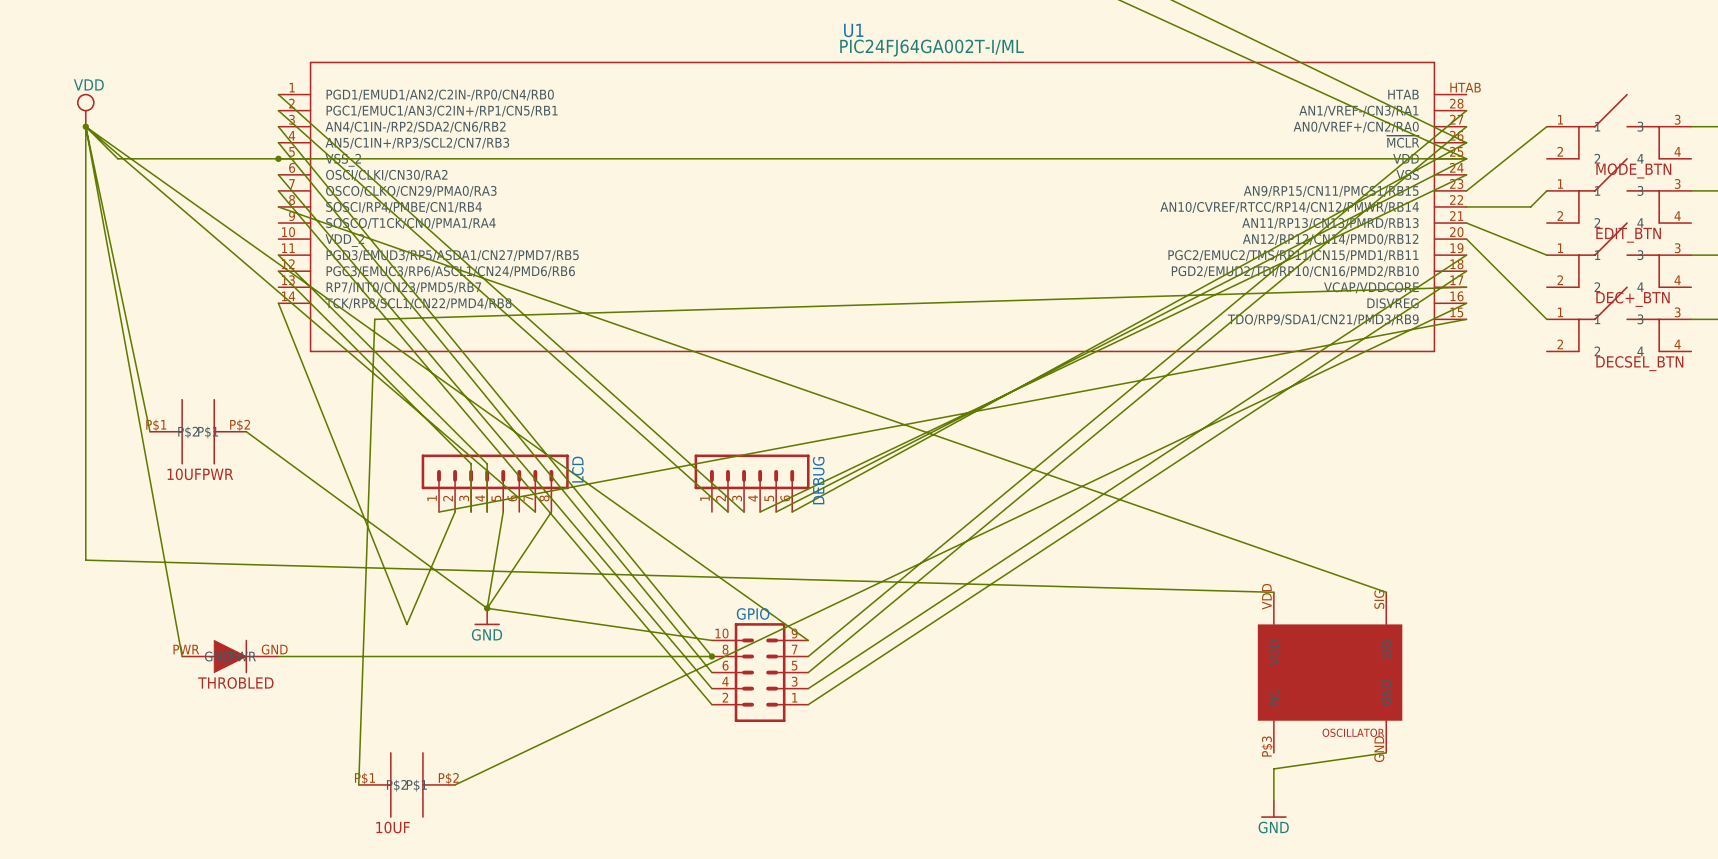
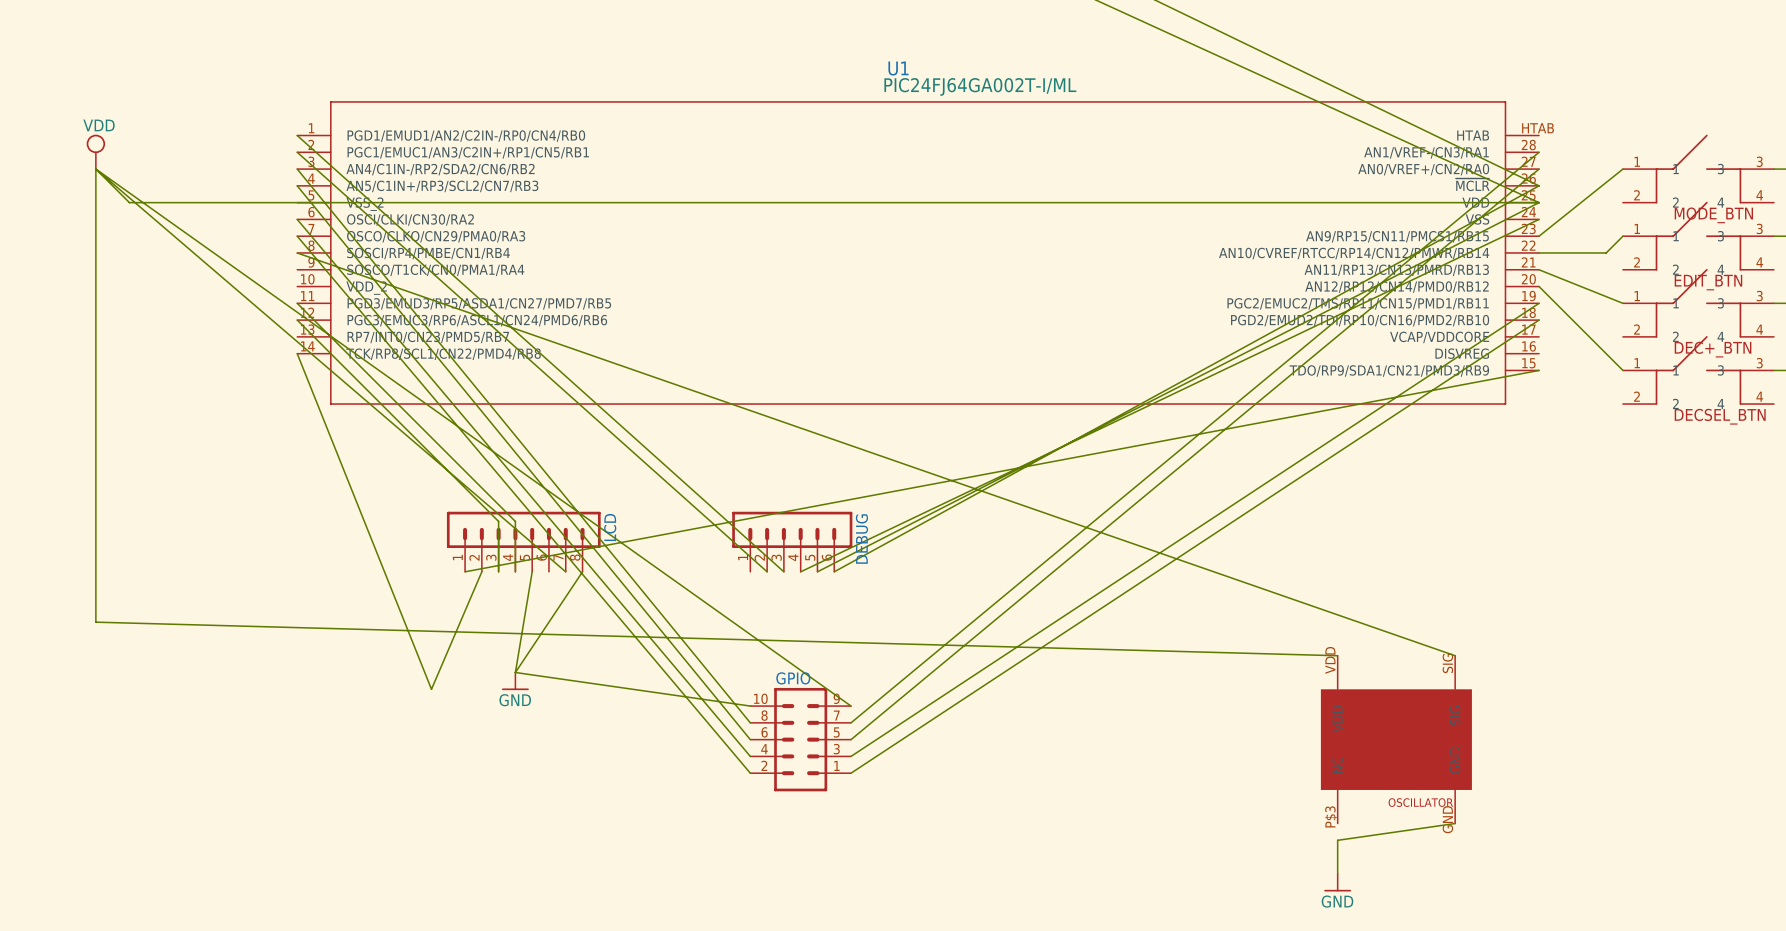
junction: (85, 126) -> none
junction: (278, 158) -> none
wire: (1466, 287) (374, 319) (358, 784) -> none
wire: (1466, 303) (455, 784) -> none
wire: (150, 431) (85, 126) (182, 656) -> none
10UFPWR: (198, 431) -> none
wire: (246, 431) (487, 608) -> none
junction: (487, 608) -> none
THROBLED: (230, 656) -> none
wire: (278, 656) (711, 656) -> none
junction: (711, 656) -> none
10UF: (406, 784) -> none

